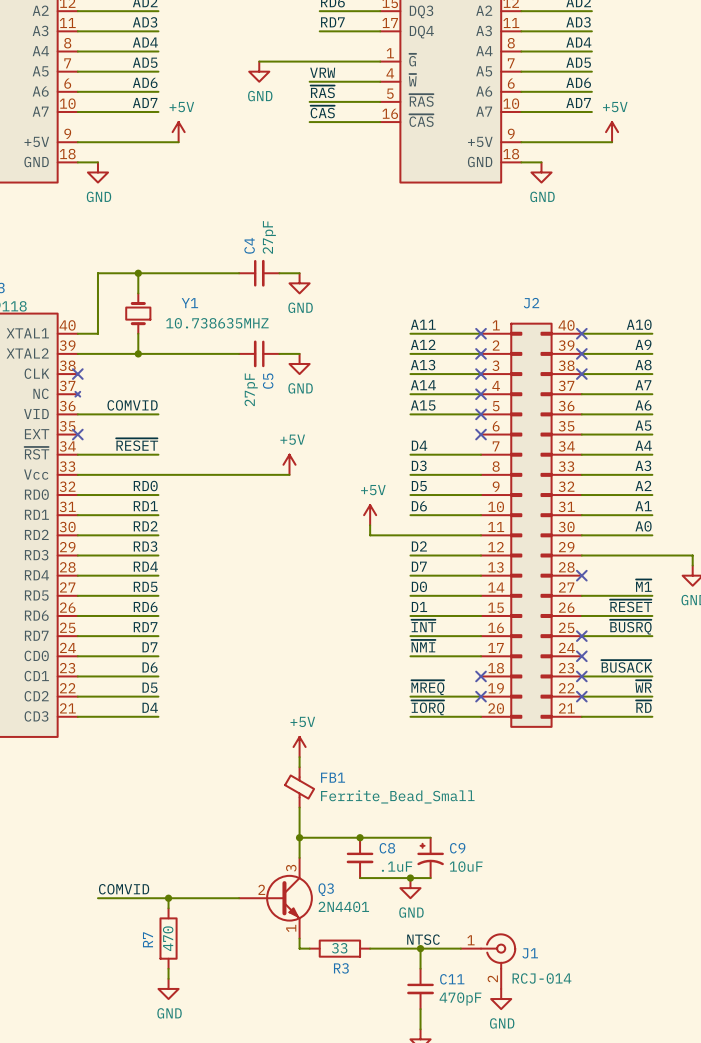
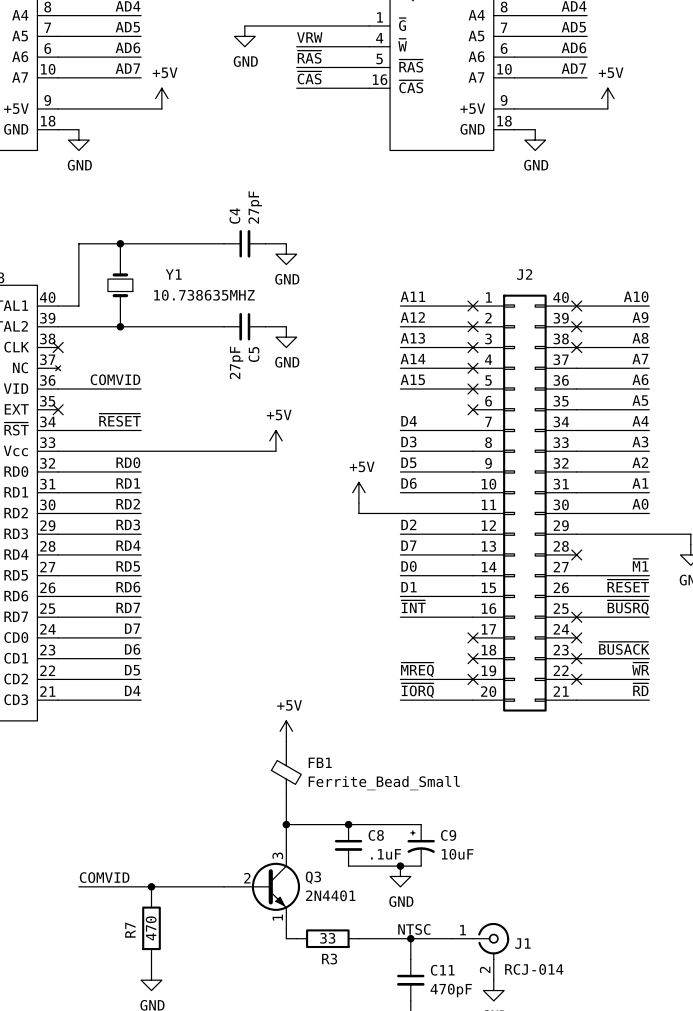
label: ~{NMI} (423, 646) -> none
wire: (410, 656) (481, 656) -> none
no-connect mark: none -> (473, 637)

